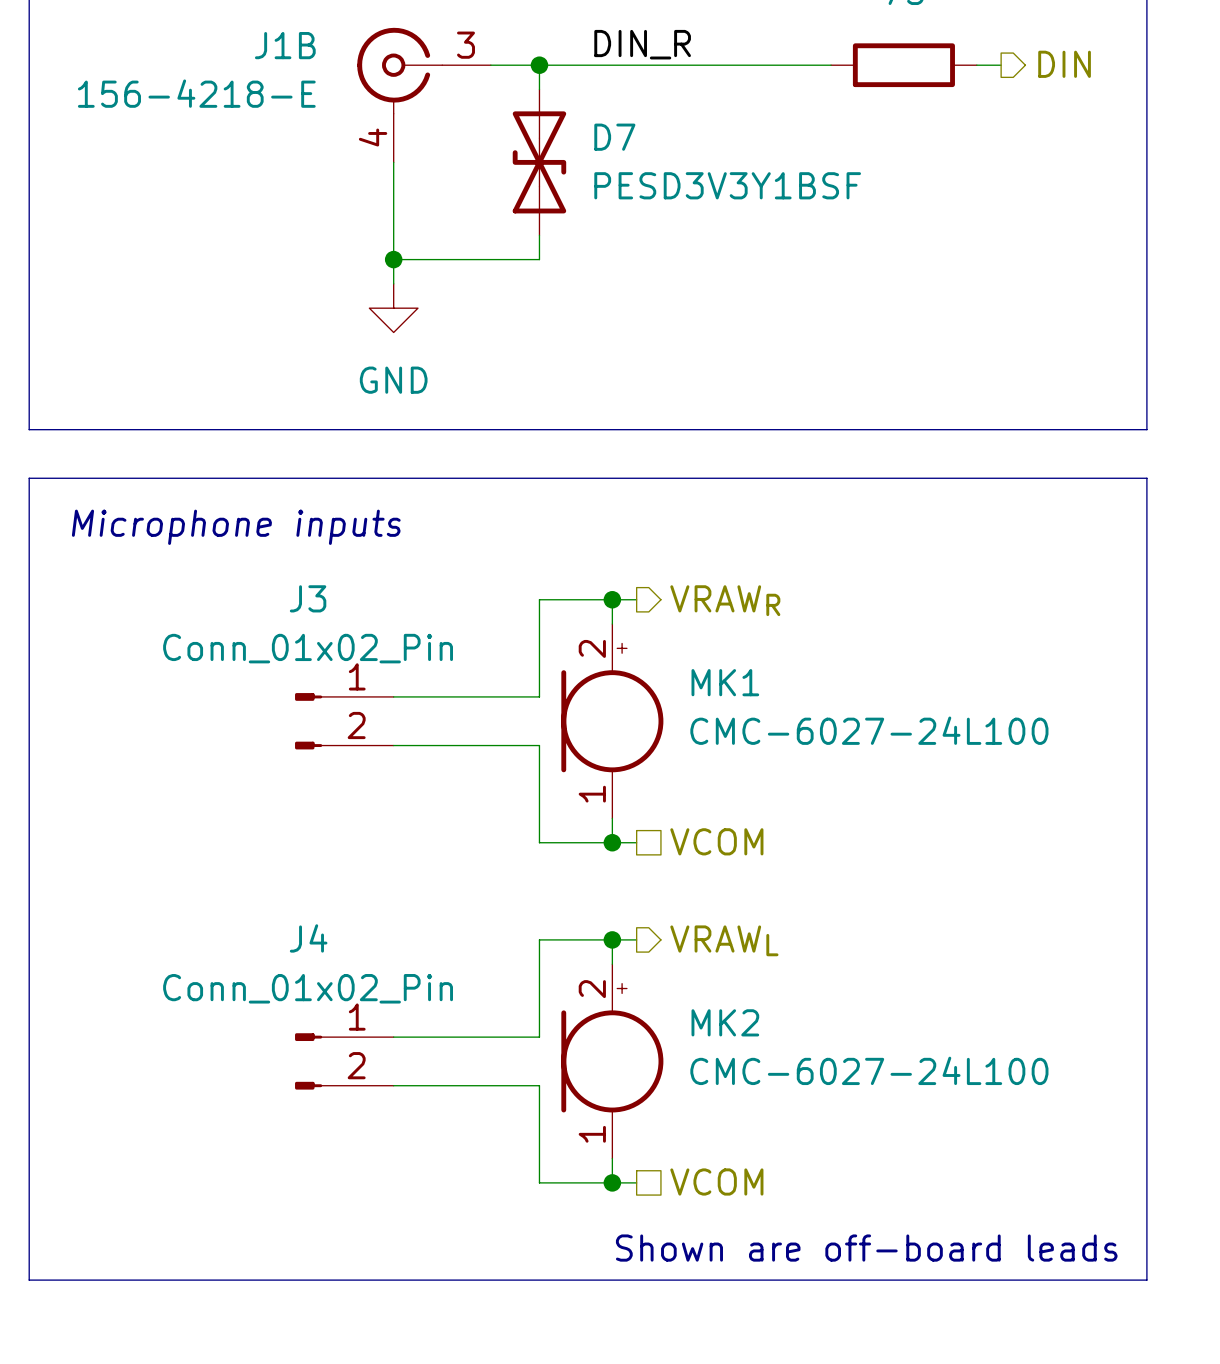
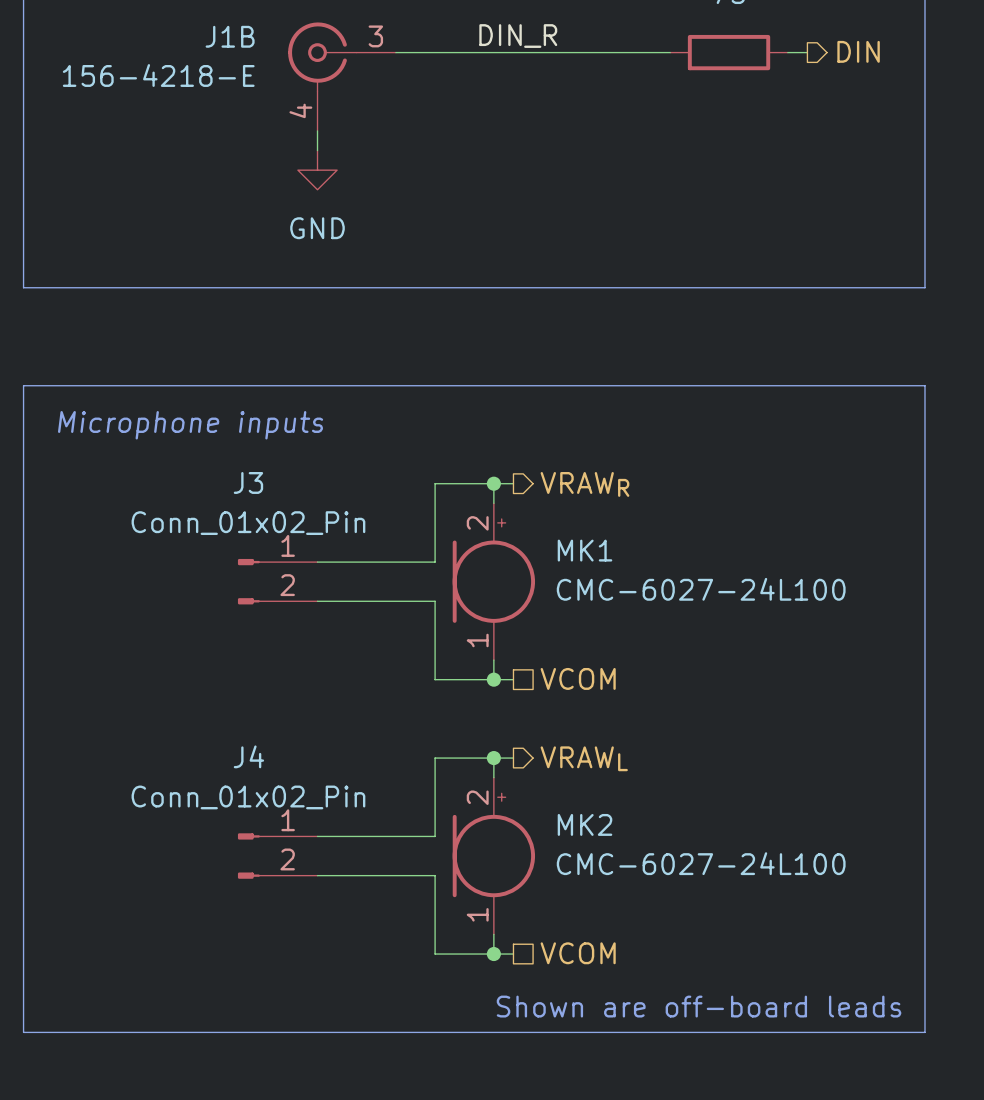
wire: (539, 65) (539, 89) -> none
junction: (539, 65) -> none
D7: PESD3V3Y1BSF (539, 162) -> none
wire: (393, 186) (393, 283) -> none
wire: (539, 235) (539, 259) (393, 259) -> none
junction: (393, 259) -> none
power symbol position: GND (393, 308) -> GND (317, 170)
line: (29, 356) (29, 429) (1146, 429) (1146, 356) -> (23, 287) (924, 287)

